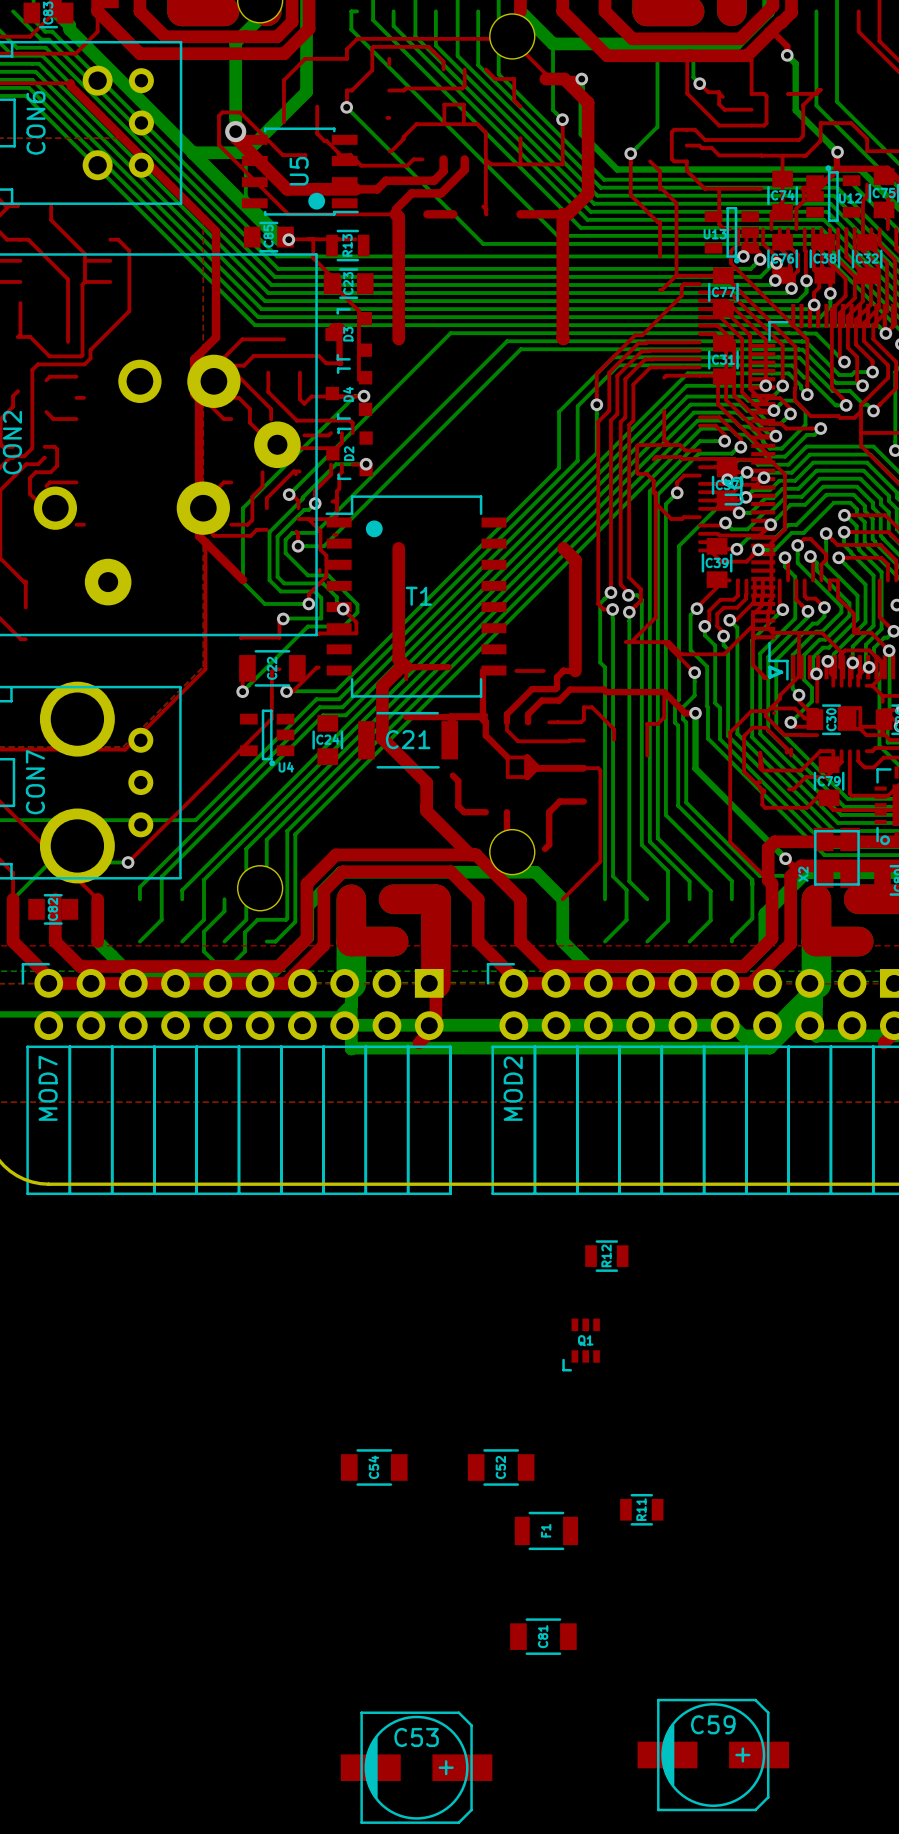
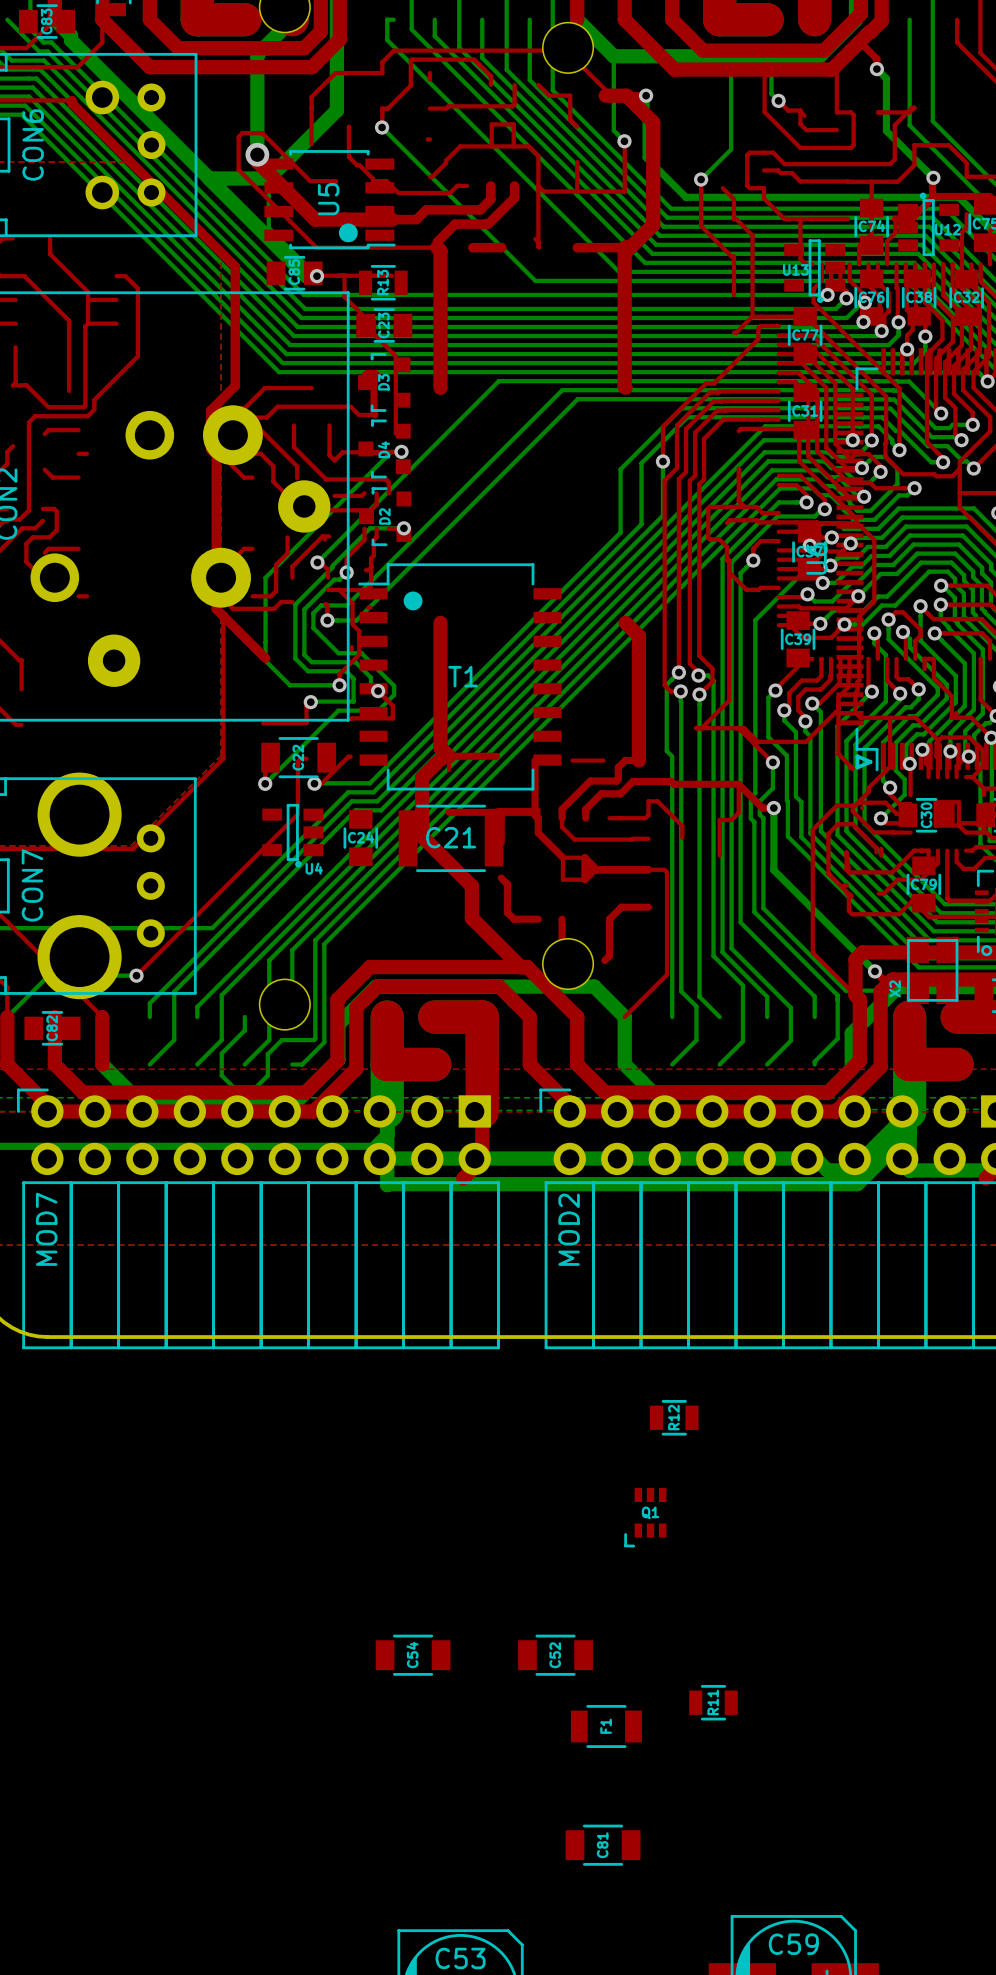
C21 footprint: [358, 711, 459, 769] -> [398, 804, 504, 873]

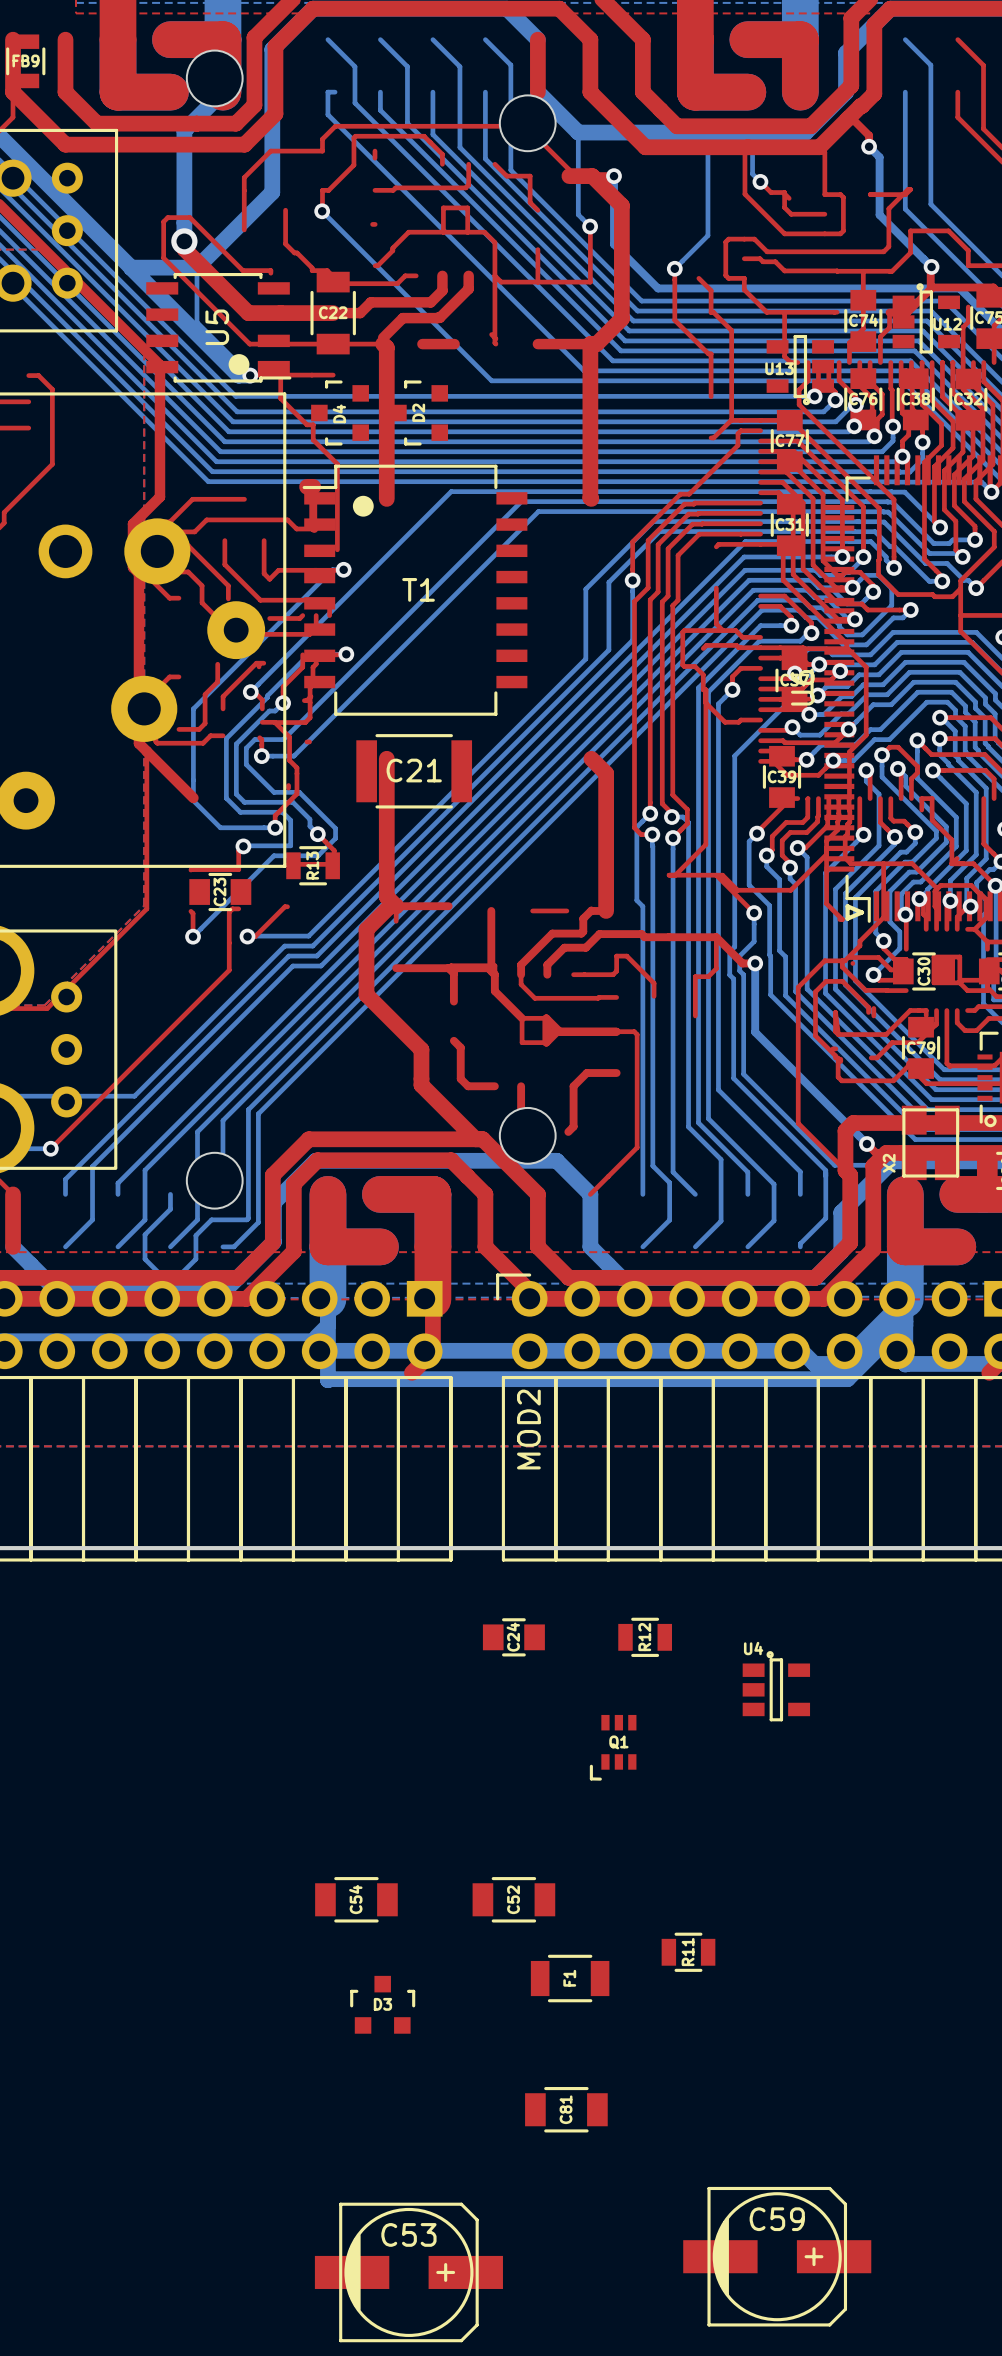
U5 position: (330, 199) -> (218, 327)
C85: (294, 273) -> none
R13 position: (383, 282) -> (313, 865)
C23 position: (384, 325) -> (220, 892)
D3 rotation: 0° (384, 382) -> 90° clockwise (382, 2004)
D3 position: (384, 382) -> (382, 2004)
D4 position: (384, 448) -> (340, 413)
D2 position: (385, 516) -> (419, 413)
T1 position: (459, 676) -> (415, 590)
C22 rotation: 0° (298, 757) -> 90° clockwise (333, 313)
C22 position: (298, 757) -> (333, 313)
U4 rotation: 0° (292, 835) -> 180° (776, 1686)
U4 position: (292, 835) -> (776, 1686)
C24 rotation: 0° (360, 838) -> 90° clockwise (513, 1637)
C24 position: (360, 838) -> (513, 1637)
C21 position: (451, 838) -> (414, 771)

